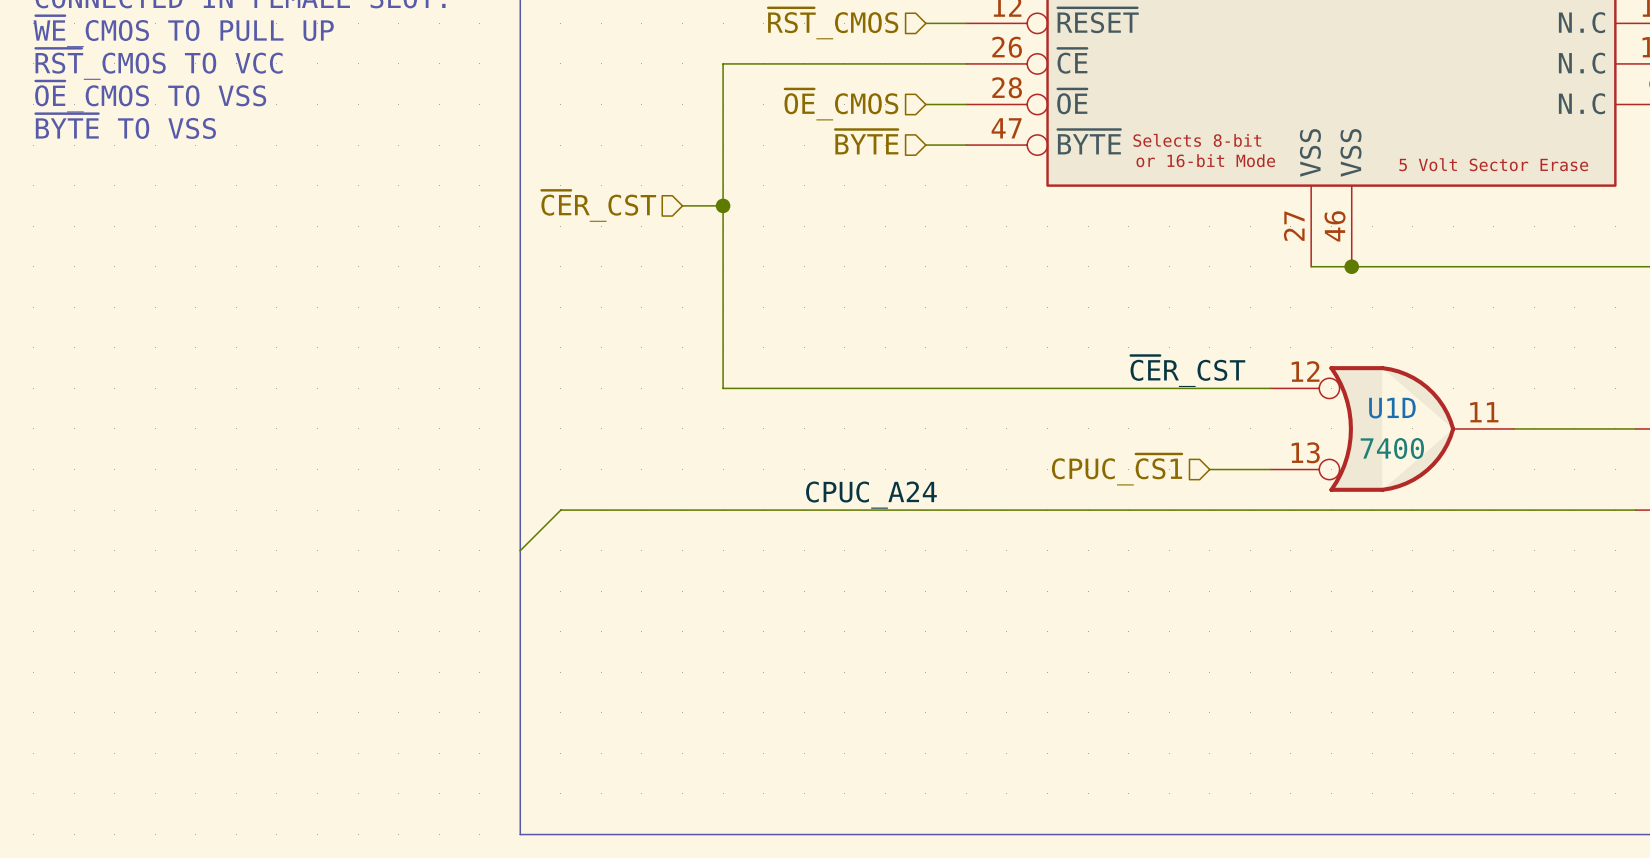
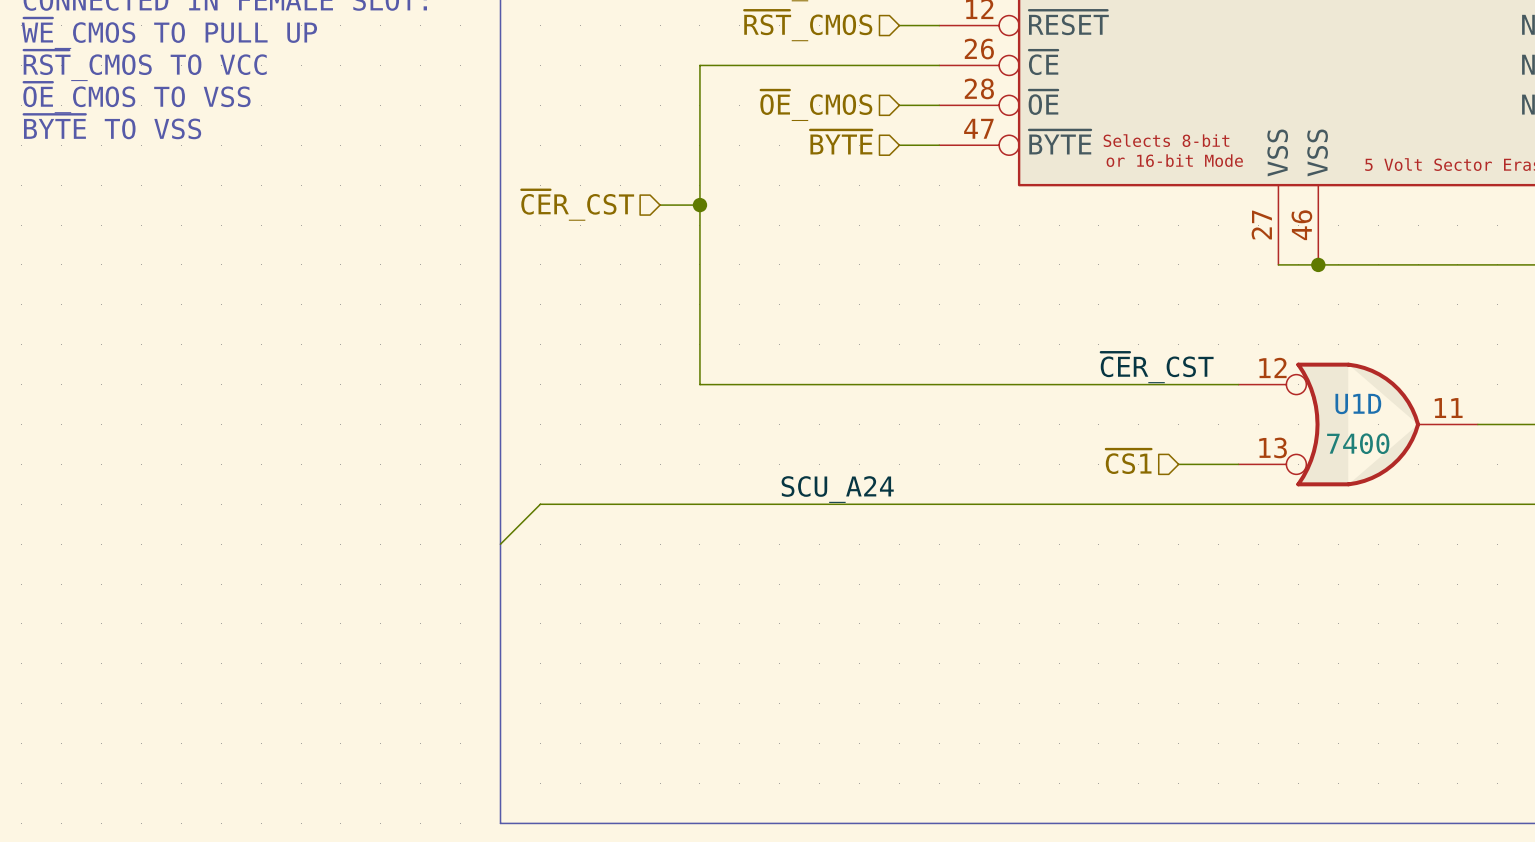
hierarchical label: CPUC_~{CS1} (1117, 469) -> ~{CS1} (1128, 461)
label: CPUC_A24 (871, 495) -> SCU_A24 (837, 489)

